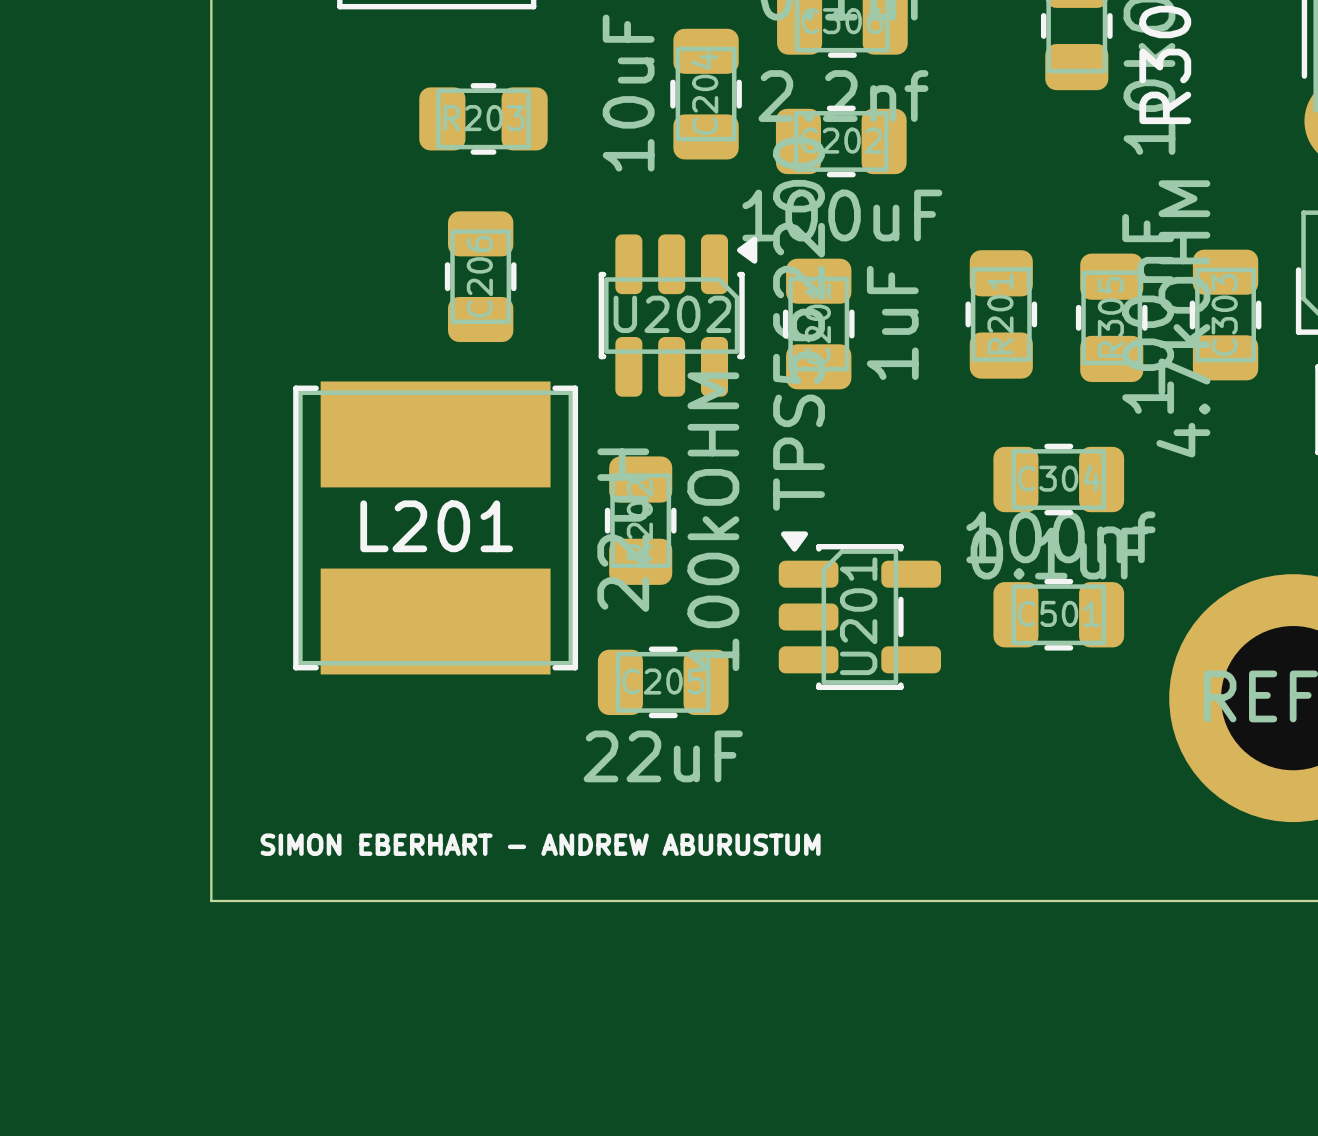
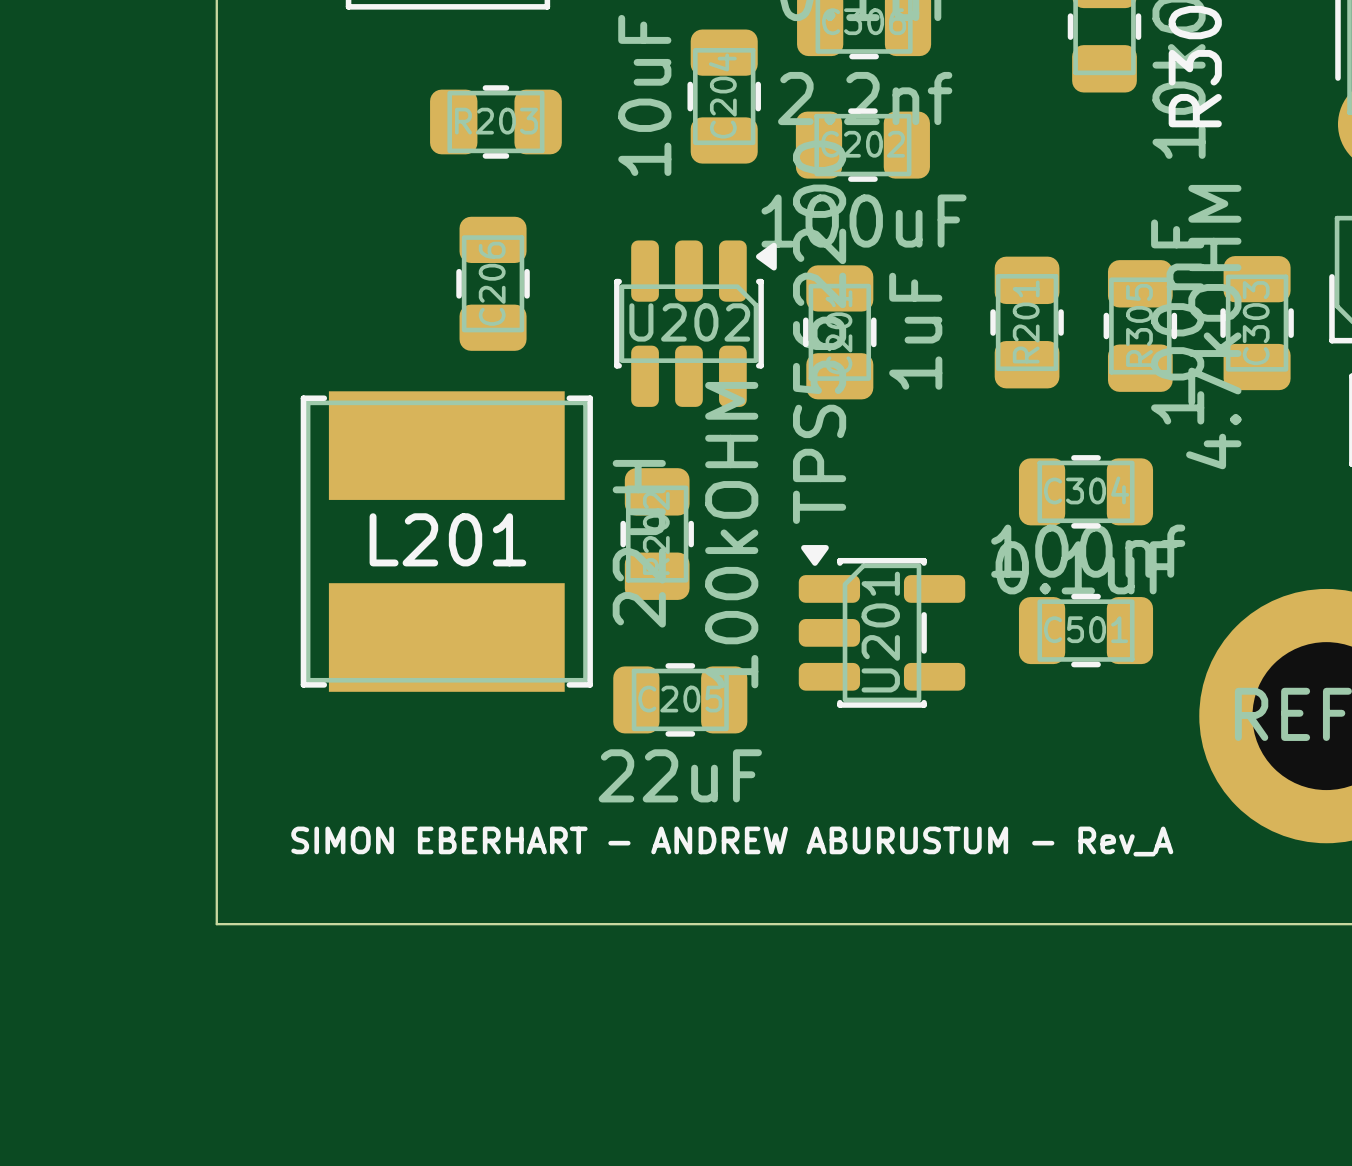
text: SIMON EBERHART - ANDREW ABURUSTUM (540, 844) -> SIMON EBERHART - ANDREW ABURUSTUM - Rev_A (732, 841)

